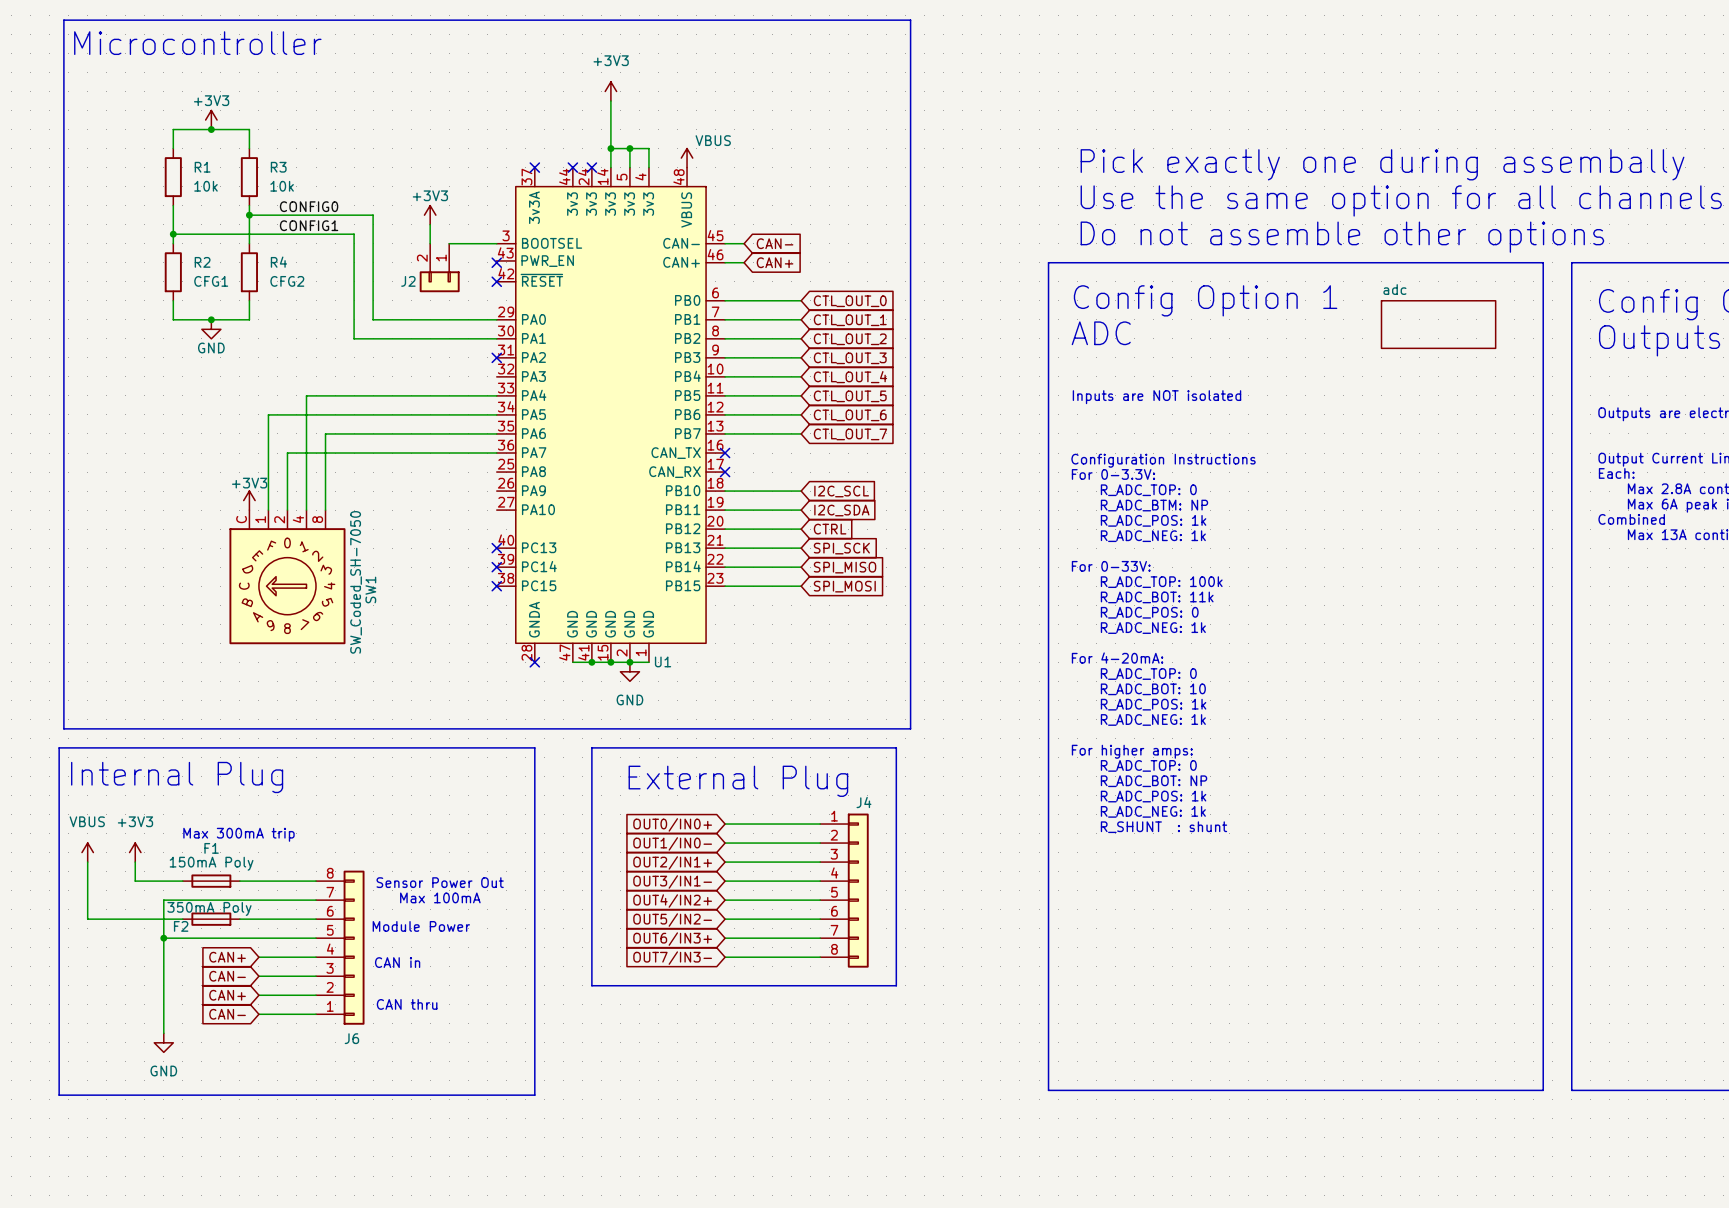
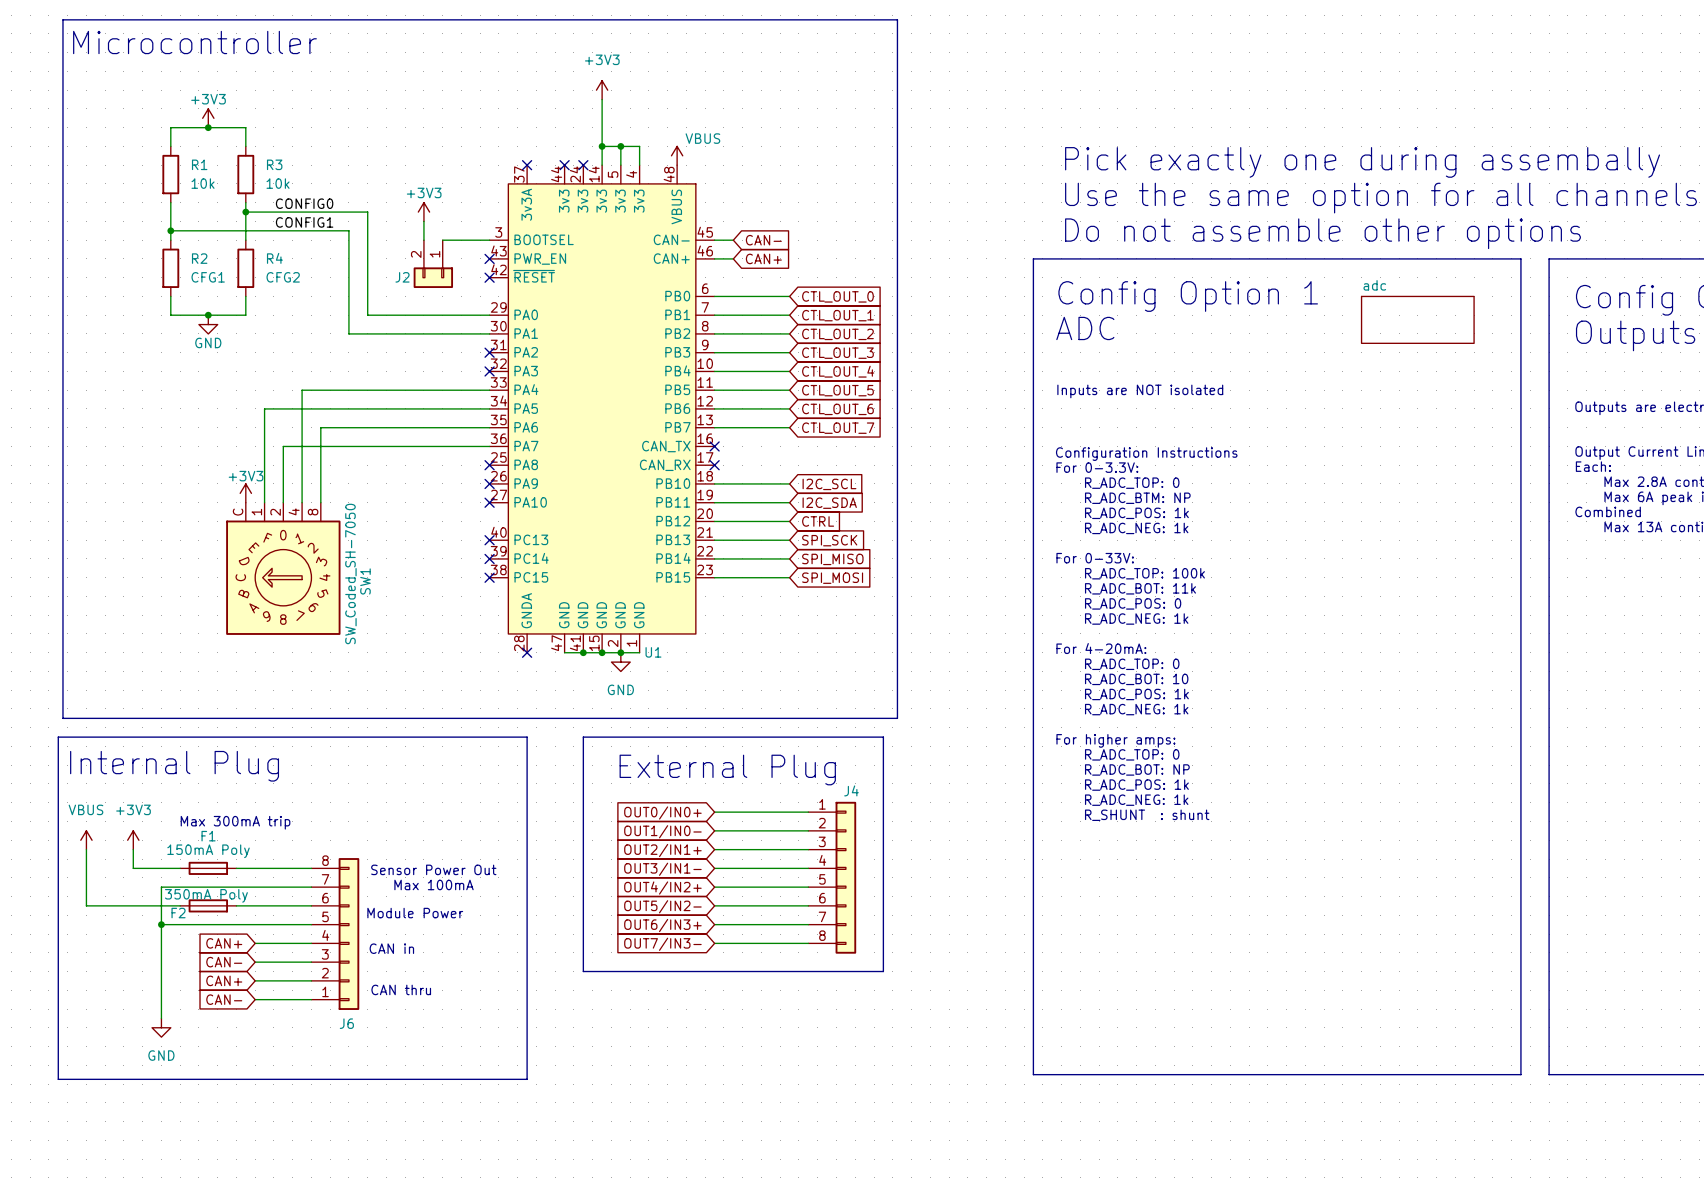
U1 symbol: [496, 167, 726, 663] -> [489, 165, 715, 653]
no-connect mark: none -> (489, 371)
no-connect mark: none -> (489, 465)
no-connect mark: none -> (489, 483)
no-connect mark: none -> (489, 502)

